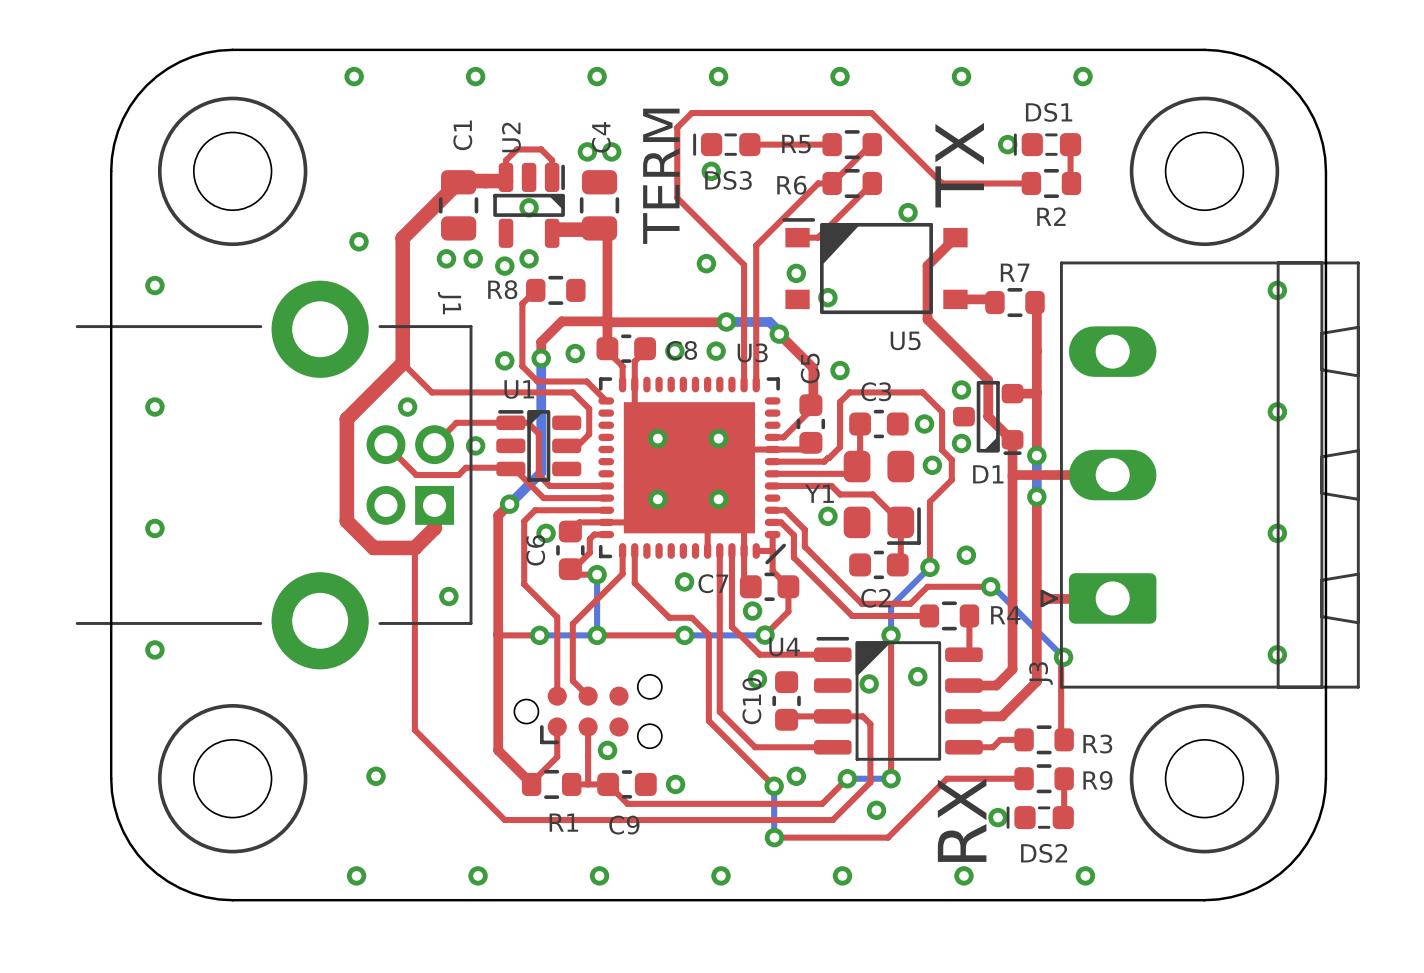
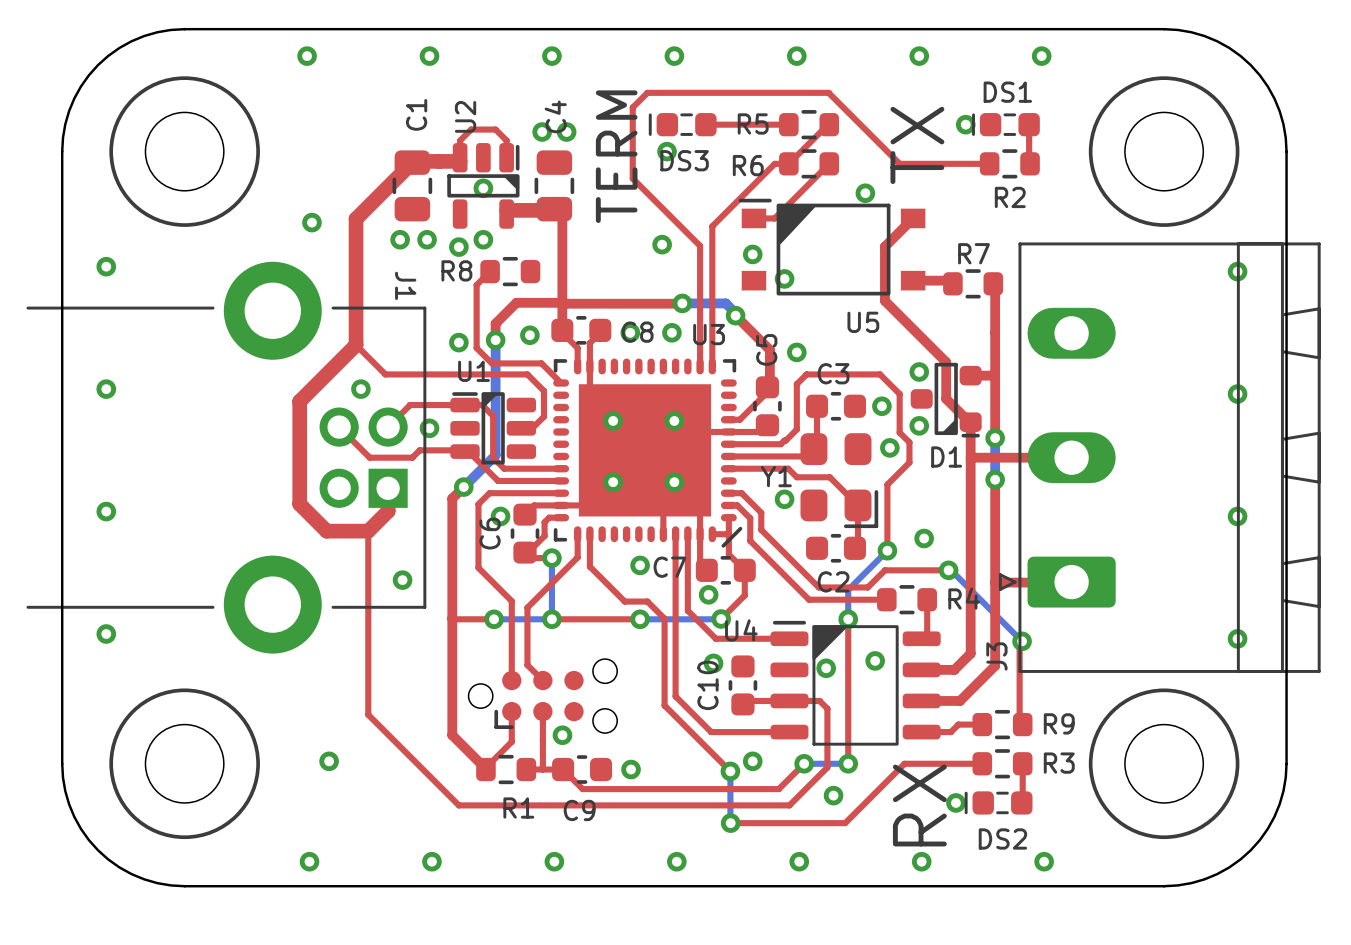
R3 name position: R3 (1097, 744) -> R3 (1059, 763)
R9 name position: R9 (1097, 780) -> R9 (1059, 723)

